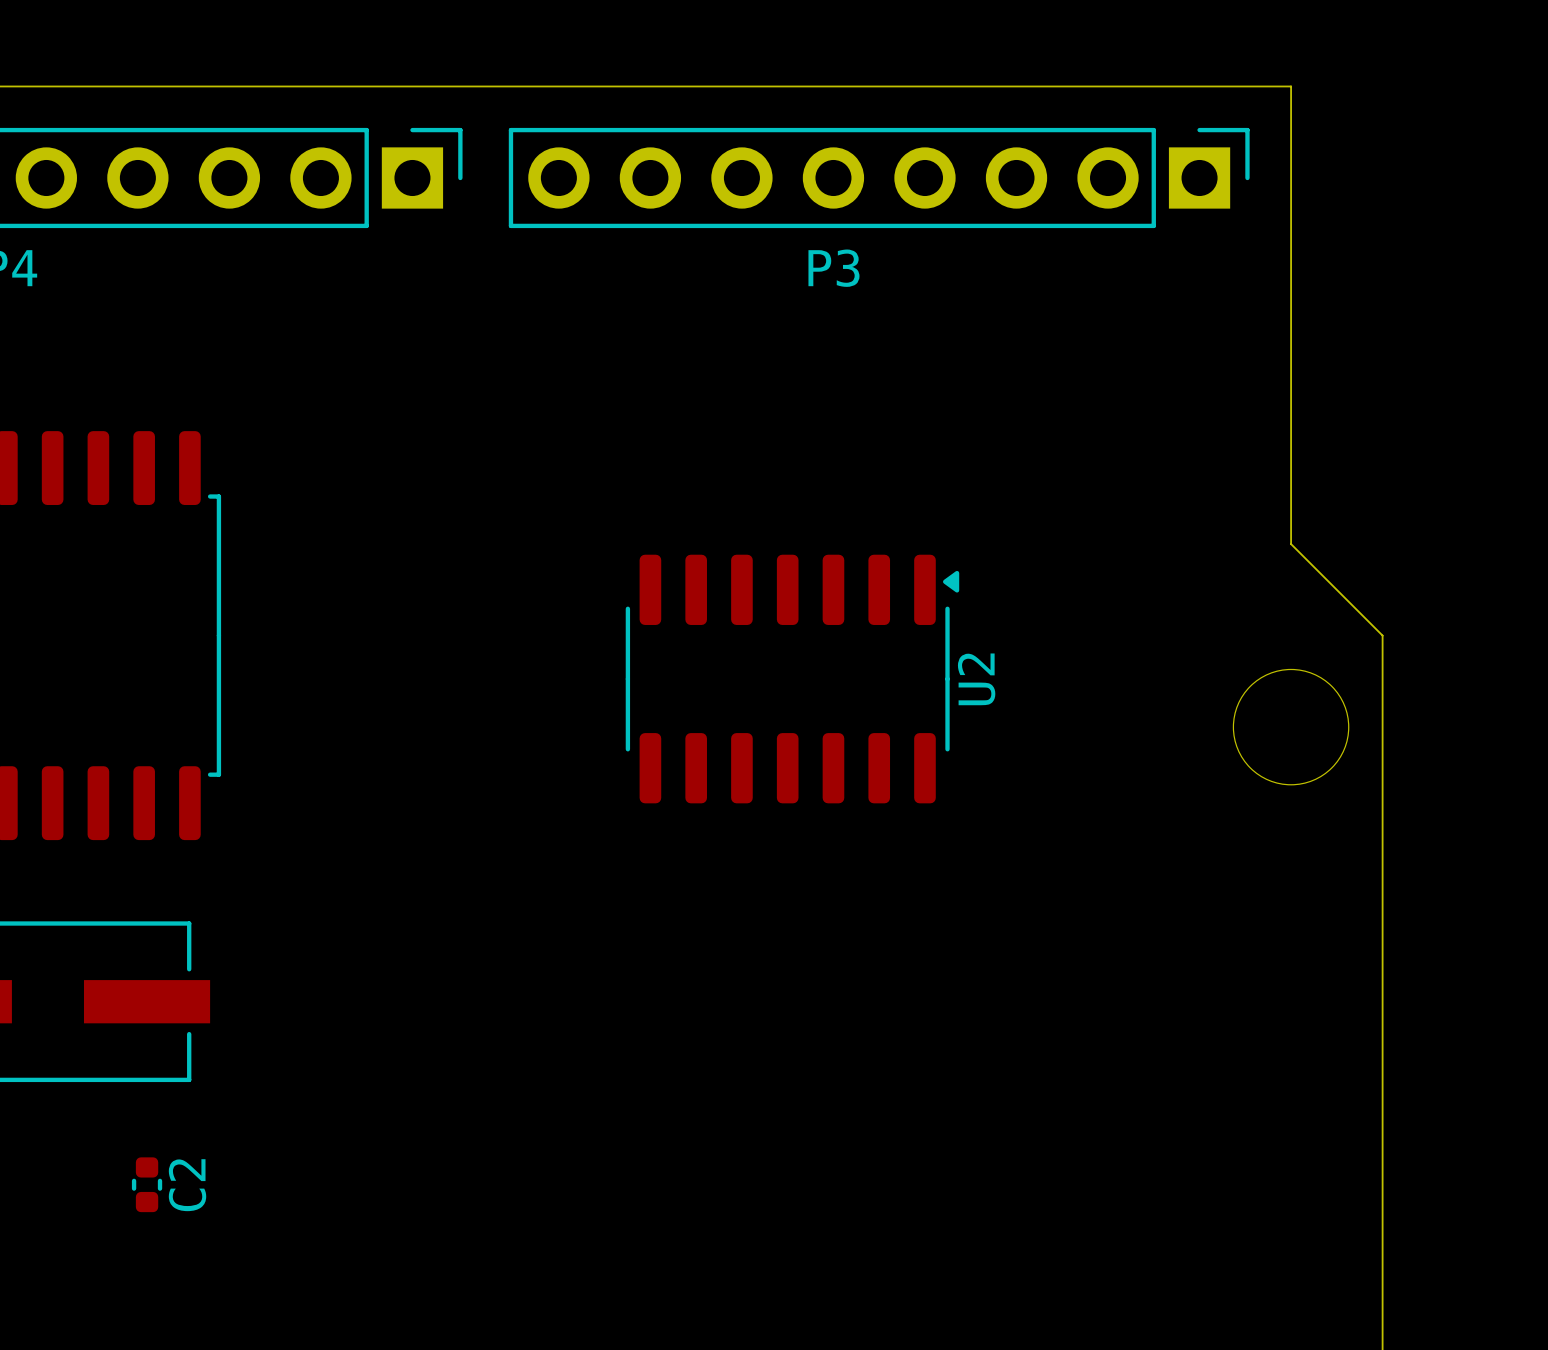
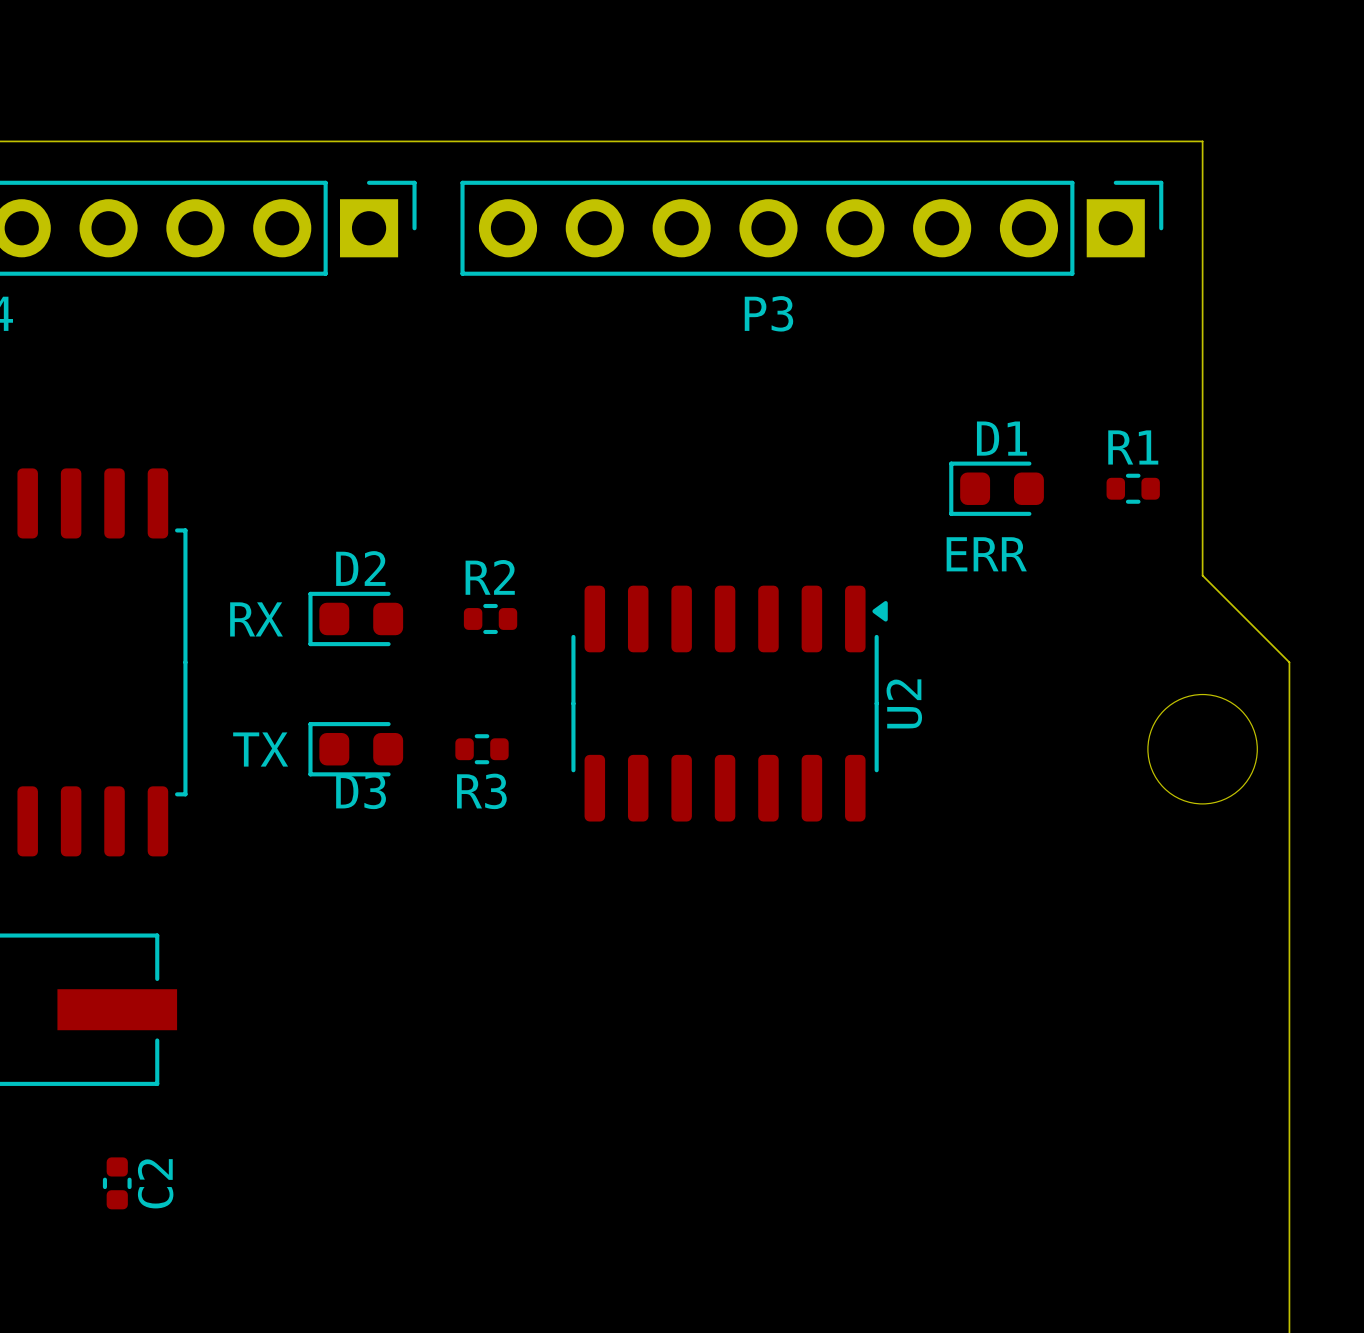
D1: none -> (996, 488)
R1: none -> (1133, 488)
text: none -> ERR (986, 554)
D2: none -> (355, 618)
R2: none -> (490, 618)
text: none -> RX (256, 619)
text: none -> TX (260, 749)
D3: none -> (355, 749)
R3: none -> (482, 749)

